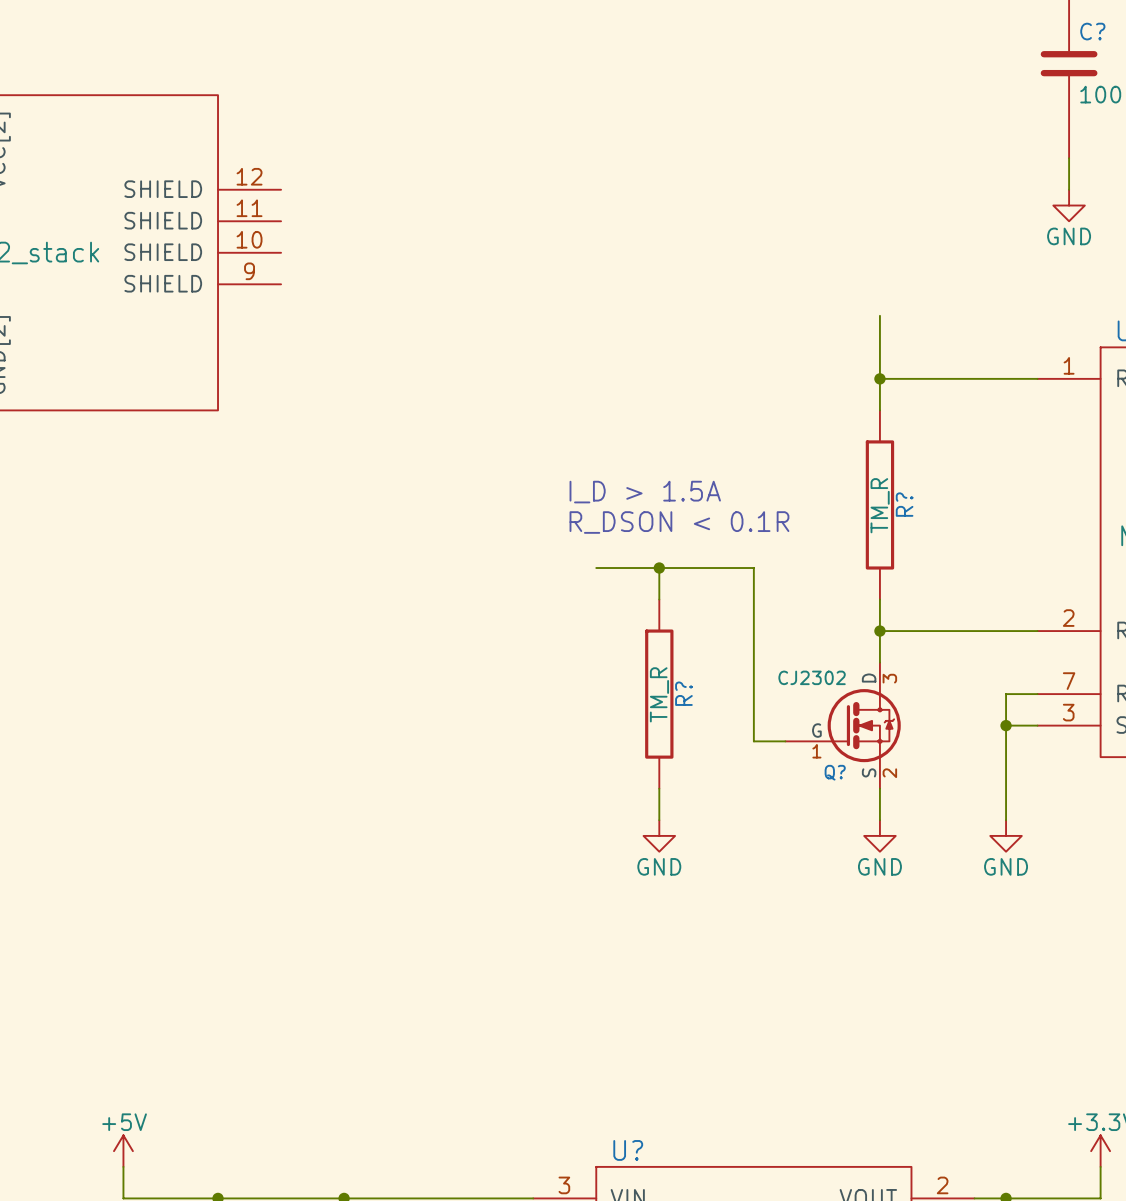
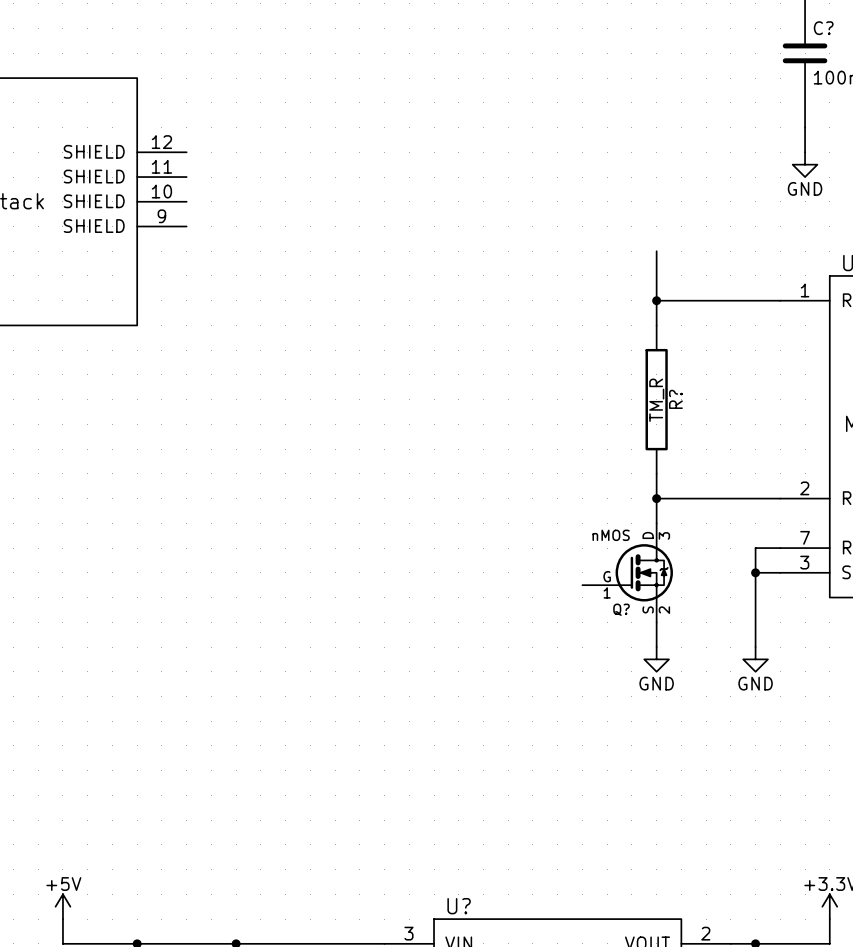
text: I_D > 1.5A (645, 492) -> none
text: R_DSON < 0.1R (679, 522) -> none
wire: (596, 568) (753, 568) (753, 741) (785, 741) -> none
wire: (659, 568) (659, 599) -> none
junction: (659, 568) -> none
Q? value: CJ2302 (812, 677) -> nMOS (611, 535)
R?: TM_R (659, 694) -> none
wire: (659, 788) (659, 820) -> none
power symbol: GND (659, 835) -> none

